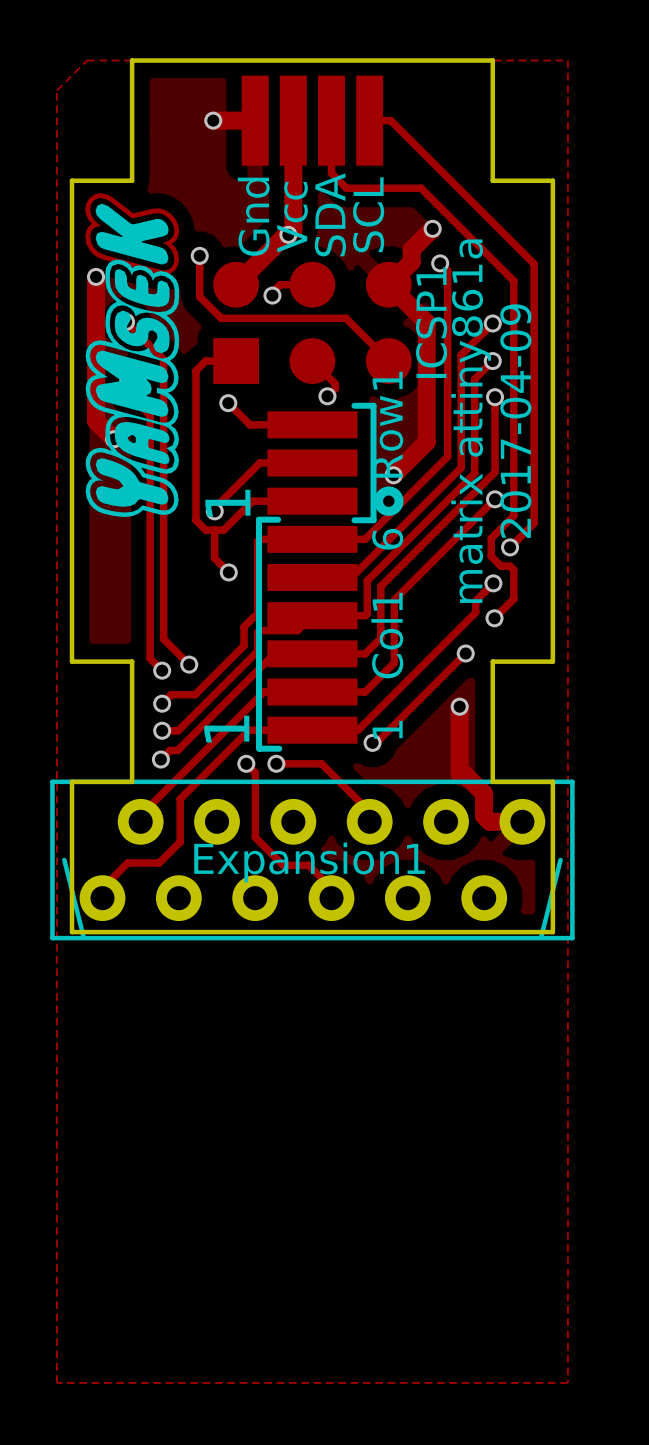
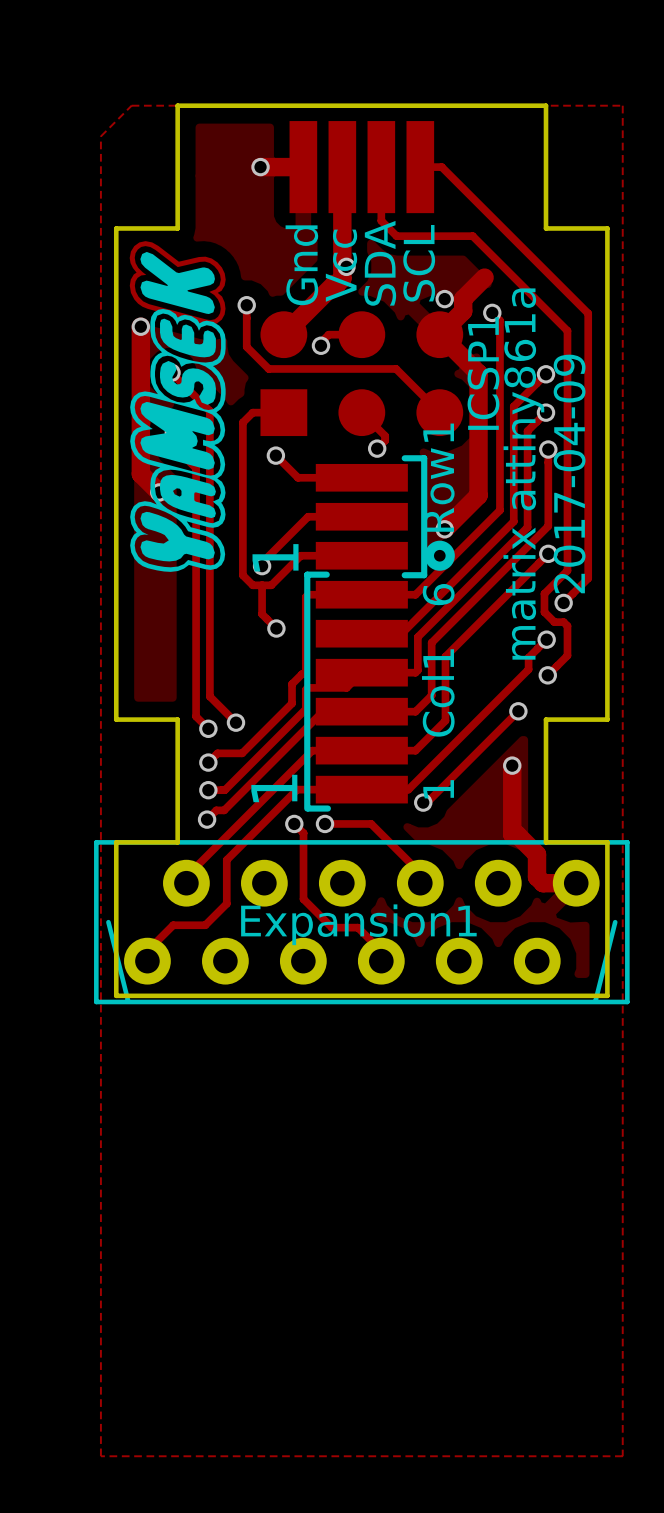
via position: (432, 228) -> (444, 299)
via position: (288, 234) -> (346, 266)

